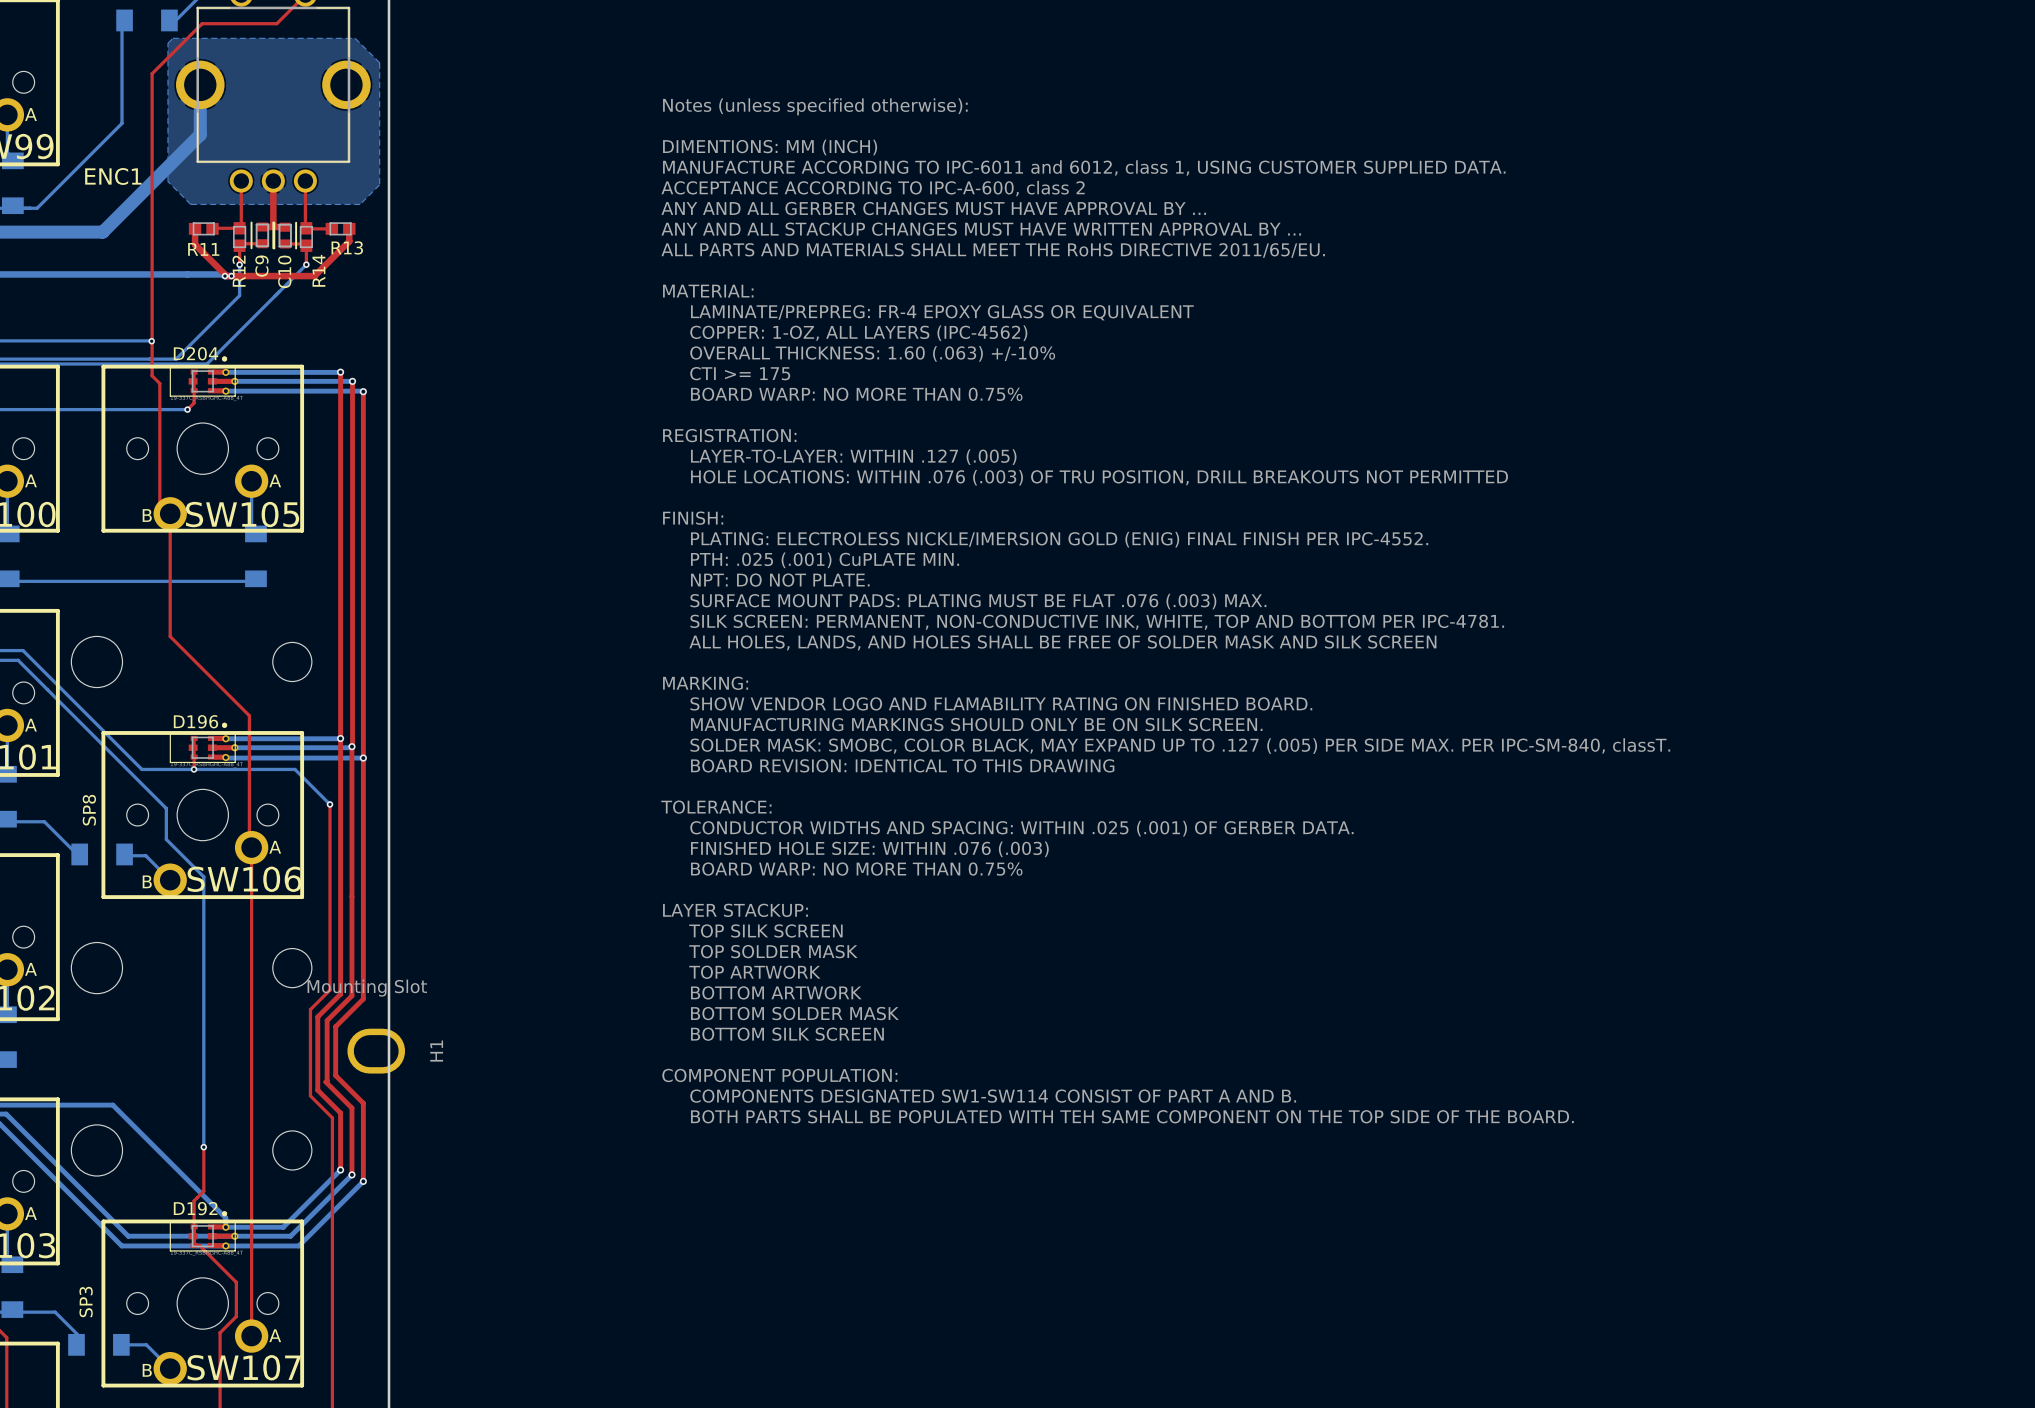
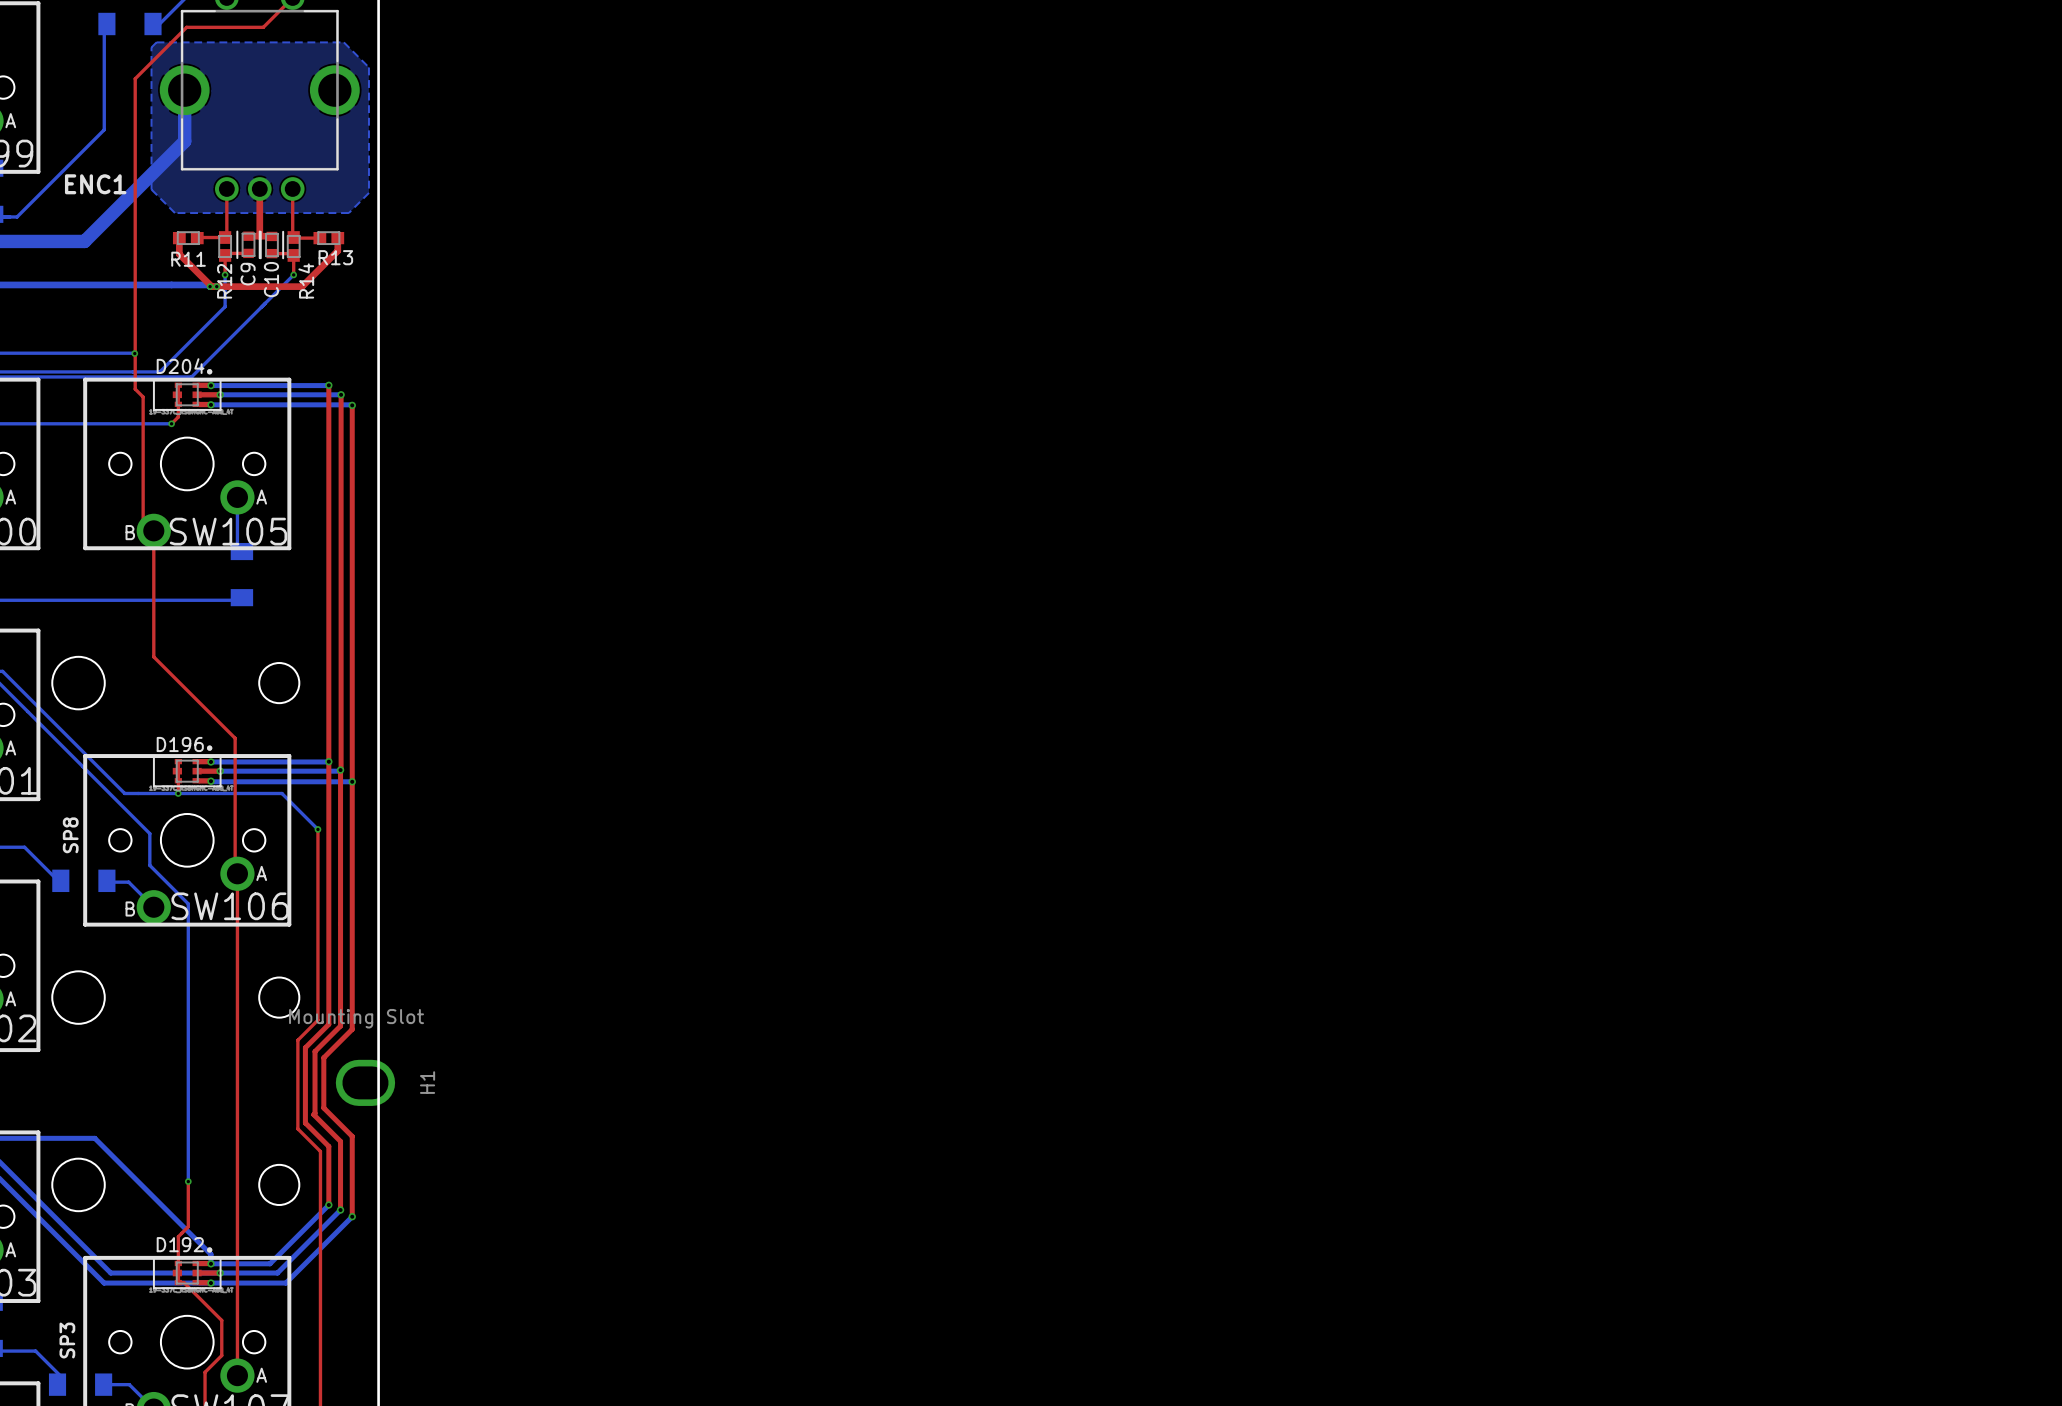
text: Notes (unless specified otherwise): (815, 106) -> none
text: DIMENTIONS: MM (INCH) (770, 147) -> none
text: MANUFACTURE ACCORDING TO IPC-6011 and 6012, class 1, USING CUSTOMER SUPPLIED DATA. (1084, 167) -> none
text: ACCEPTANCE ACCORDING TO IPC-A-600, class 2 (873, 188) -> none
text: ANY AND ALL GERBER CHANGES MUST HAVE APPROVAL BY ... (933, 208) -> none
text: ANY AND ALL STACKUP CHANGES MUST HAVE WRITTEN APPROVAL BY ... (981, 229) -> none
text: ALL PARTS AND MATERIALS SHALL MEET THE RoHS DIRECTIVE 2011/65/EU. (993, 250) -> none
text: MATERIAL: (708, 291) -> none
text: LAMINATE/PREPREG: FR-4 EPOXY GLASS OR EQUIVALENT (942, 312) -> none
text: COPPER: 1-OZ, ALL LAYERS (IPC-4562) (858, 333) -> none
text: OVERALL THICKNESS: 1.60 (.063) +/-10% (872, 353) -> none
text: CTI >= 175 (740, 373) -> none
text: BOARD WARP: NO MORE THAN 0.75% (856, 394) -> none
text: REGISTRATION: (729, 435) -> none
text: LAYER-TO-LAYER: WITHIN .127 (.005) (853, 457) -> none
text: HOLE LOCATIONS: WITHIN .076 (.003) OF TRU POSITION, DRILL BREAKOUTS NOT PERMITTED (1099, 477) -> none
text: FINISH: (693, 518) -> none
text: PLATING: ELECTROLESS NICKLE/IMERSION GOLD (ENIG) FINAL FINISH PER IPC-4552. (1059, 539) -> none
text: PTH: .025 (.001) CuPLATE MIN. (825, 560) -> none
text: NPT: DO NOT PLATE. (780, 580) -> none
text: SURFACE MOUNT PADS: PLATING MUST BE FLAT .076 (.003) MAX. (978, 601) -> none
text: SILK SCREEN: PERMANENT, NON-CONDUCTIVE INK, WHITE, TOP AND BOTTOM PER IPC-4781. (1097, 622) -> none
text: ALL HOLES, LANDS, AND HOLES SHALL BE FREE OF SOLDER MASK AND SILK SCREEN (1062, 642) -> none
text: MARKING: (705, 683) -> none
text: SHOW VENDOR LOGO AND FLAMABILITY RATING ON FINISHED BOARD. (1001, 703) -> none
text: MANUFACTURING MARKINGS SHOULD ONLY BE ON SILK SCREEN. (976, 724) -> none
text: SOLDER MASK: SMOBC, COLOR BLACK, MAY EXPAND UP TO .127 (.005) PER SIDE MAX. PER IPC-SM-840, classT. (1180, 746) -> none
text: BOARD REVISION: IDENTICAL TO THIS DRAWING (902, 765) -> none
text: TOLERANCE: (716, 807) -> none
text: CONDUCTOR WIDTHS AND SPACING: WITHIN .025 (.001) OF GERBER DATA. (1021, 828) -> none
text: FINISHED HOLE SIZE: WITHIN .076 (.003) (869, 849) -> none
text: BOARD WARP: NO MORE THAN 0.75% (856, 869) -> none
text: LAYER STACKUP: (735, 910) -> none
text: TOP SILK SCREEN (765, 930) -> none
text: TOP SOLDER MASK (773, 951) -> none
text: TOP ARTWORK (754, 972) -> none
text: BOTTOM ARTWORK (776, 992) -> none
text: BOTTOM SOLDER MASK (794, 1013) -> none
text: BOTTOM SILK SCREEN (787, 1034) -> none
text: COMPONENT POPULATION: (779, 1075) -> none
text: COMPONENTS DESIGNATED SW1-SW114 CONSIST OF PART A AND B. (993, 1096) -> none
text: BOTH PARTS SHALL BE POPULATED WITH TEH SAME COMPONENT ON THE TOP SIDE OF THE BOARD. (1132, 1116) -> none

